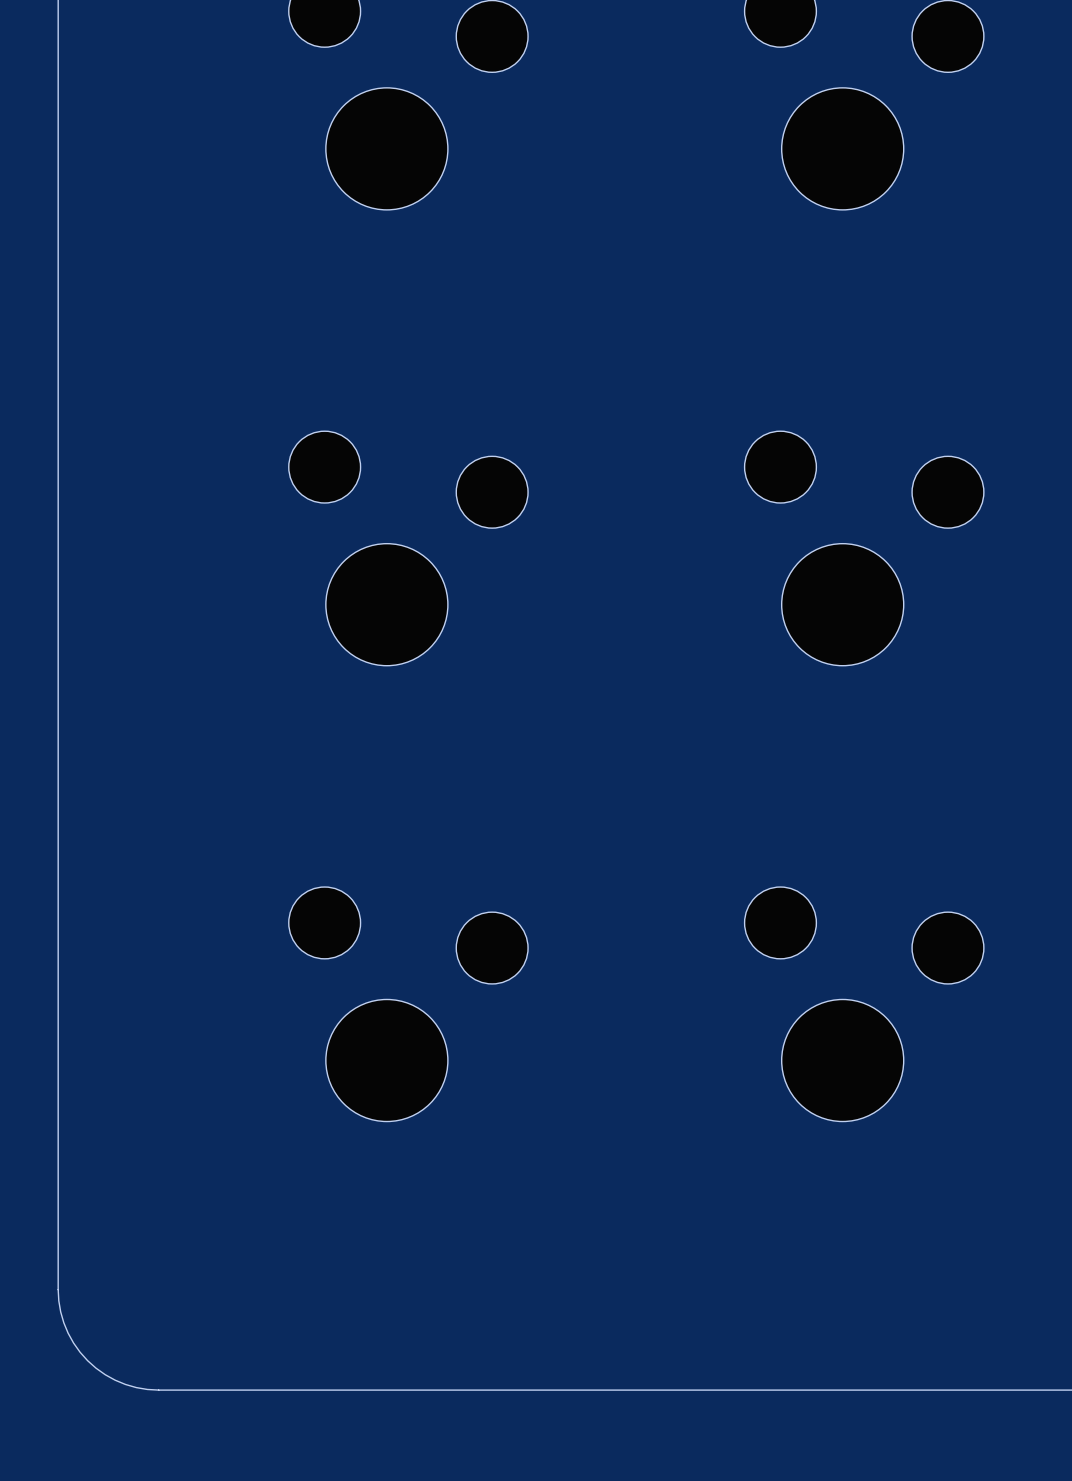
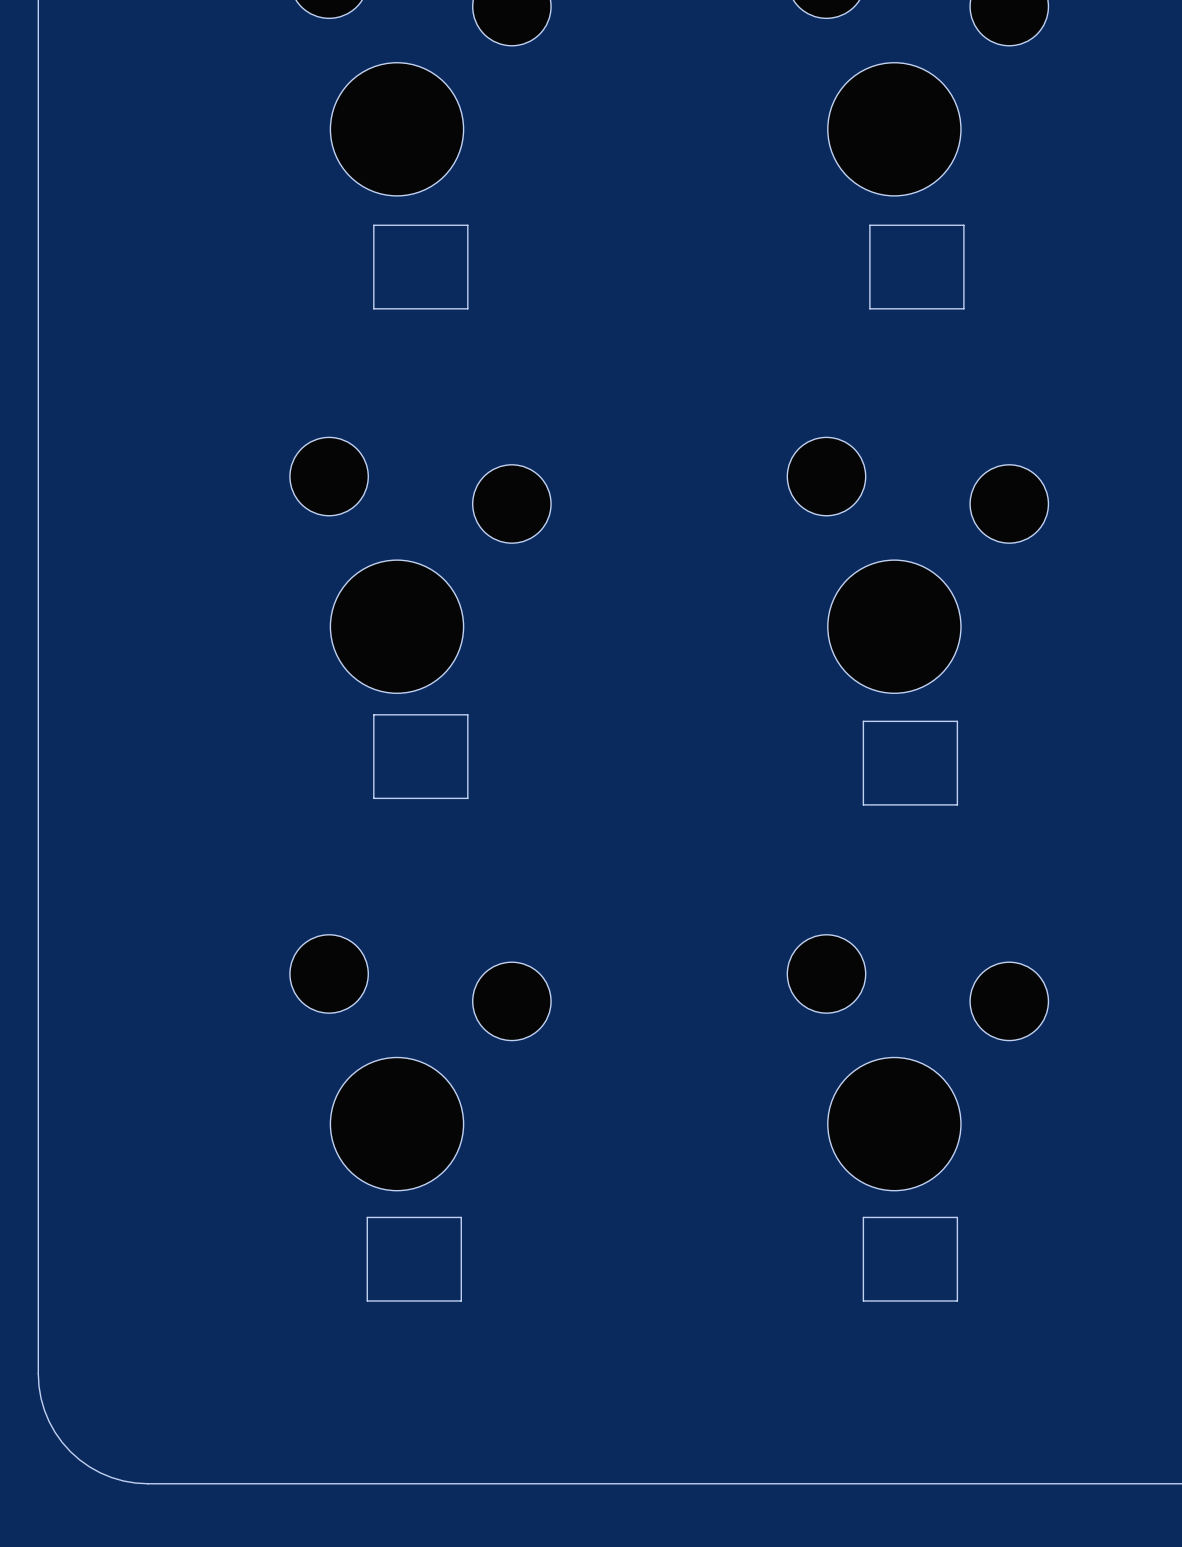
part: none -> (420, 267)
part: none -> (916, 267)
part: none -> (420, 756)
part: none -> (910, 763)
part: none -> (414, 1259)
part: none -> (910, 1259)

